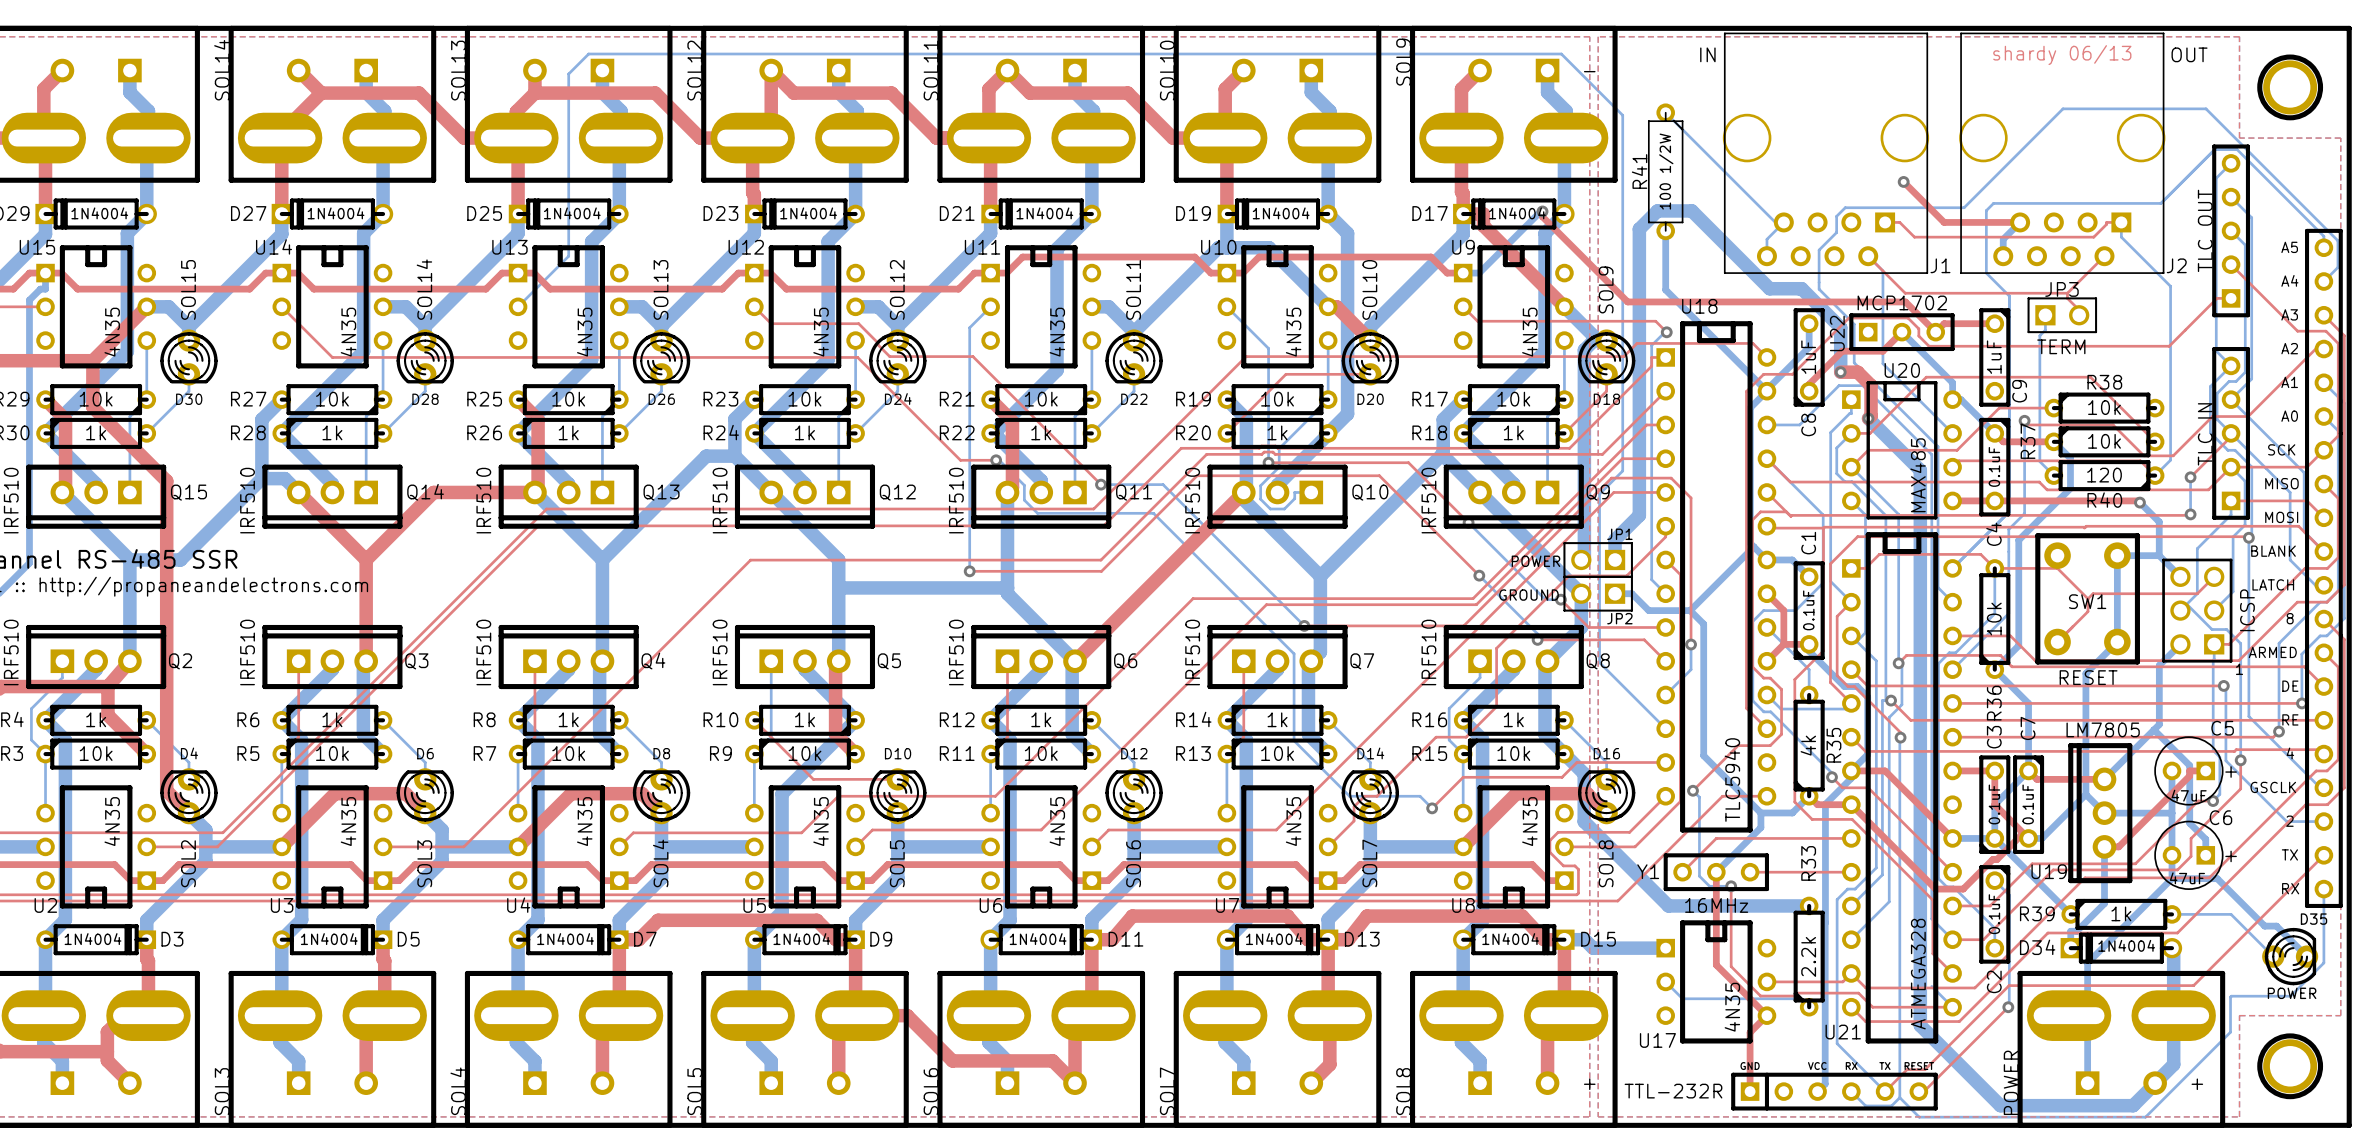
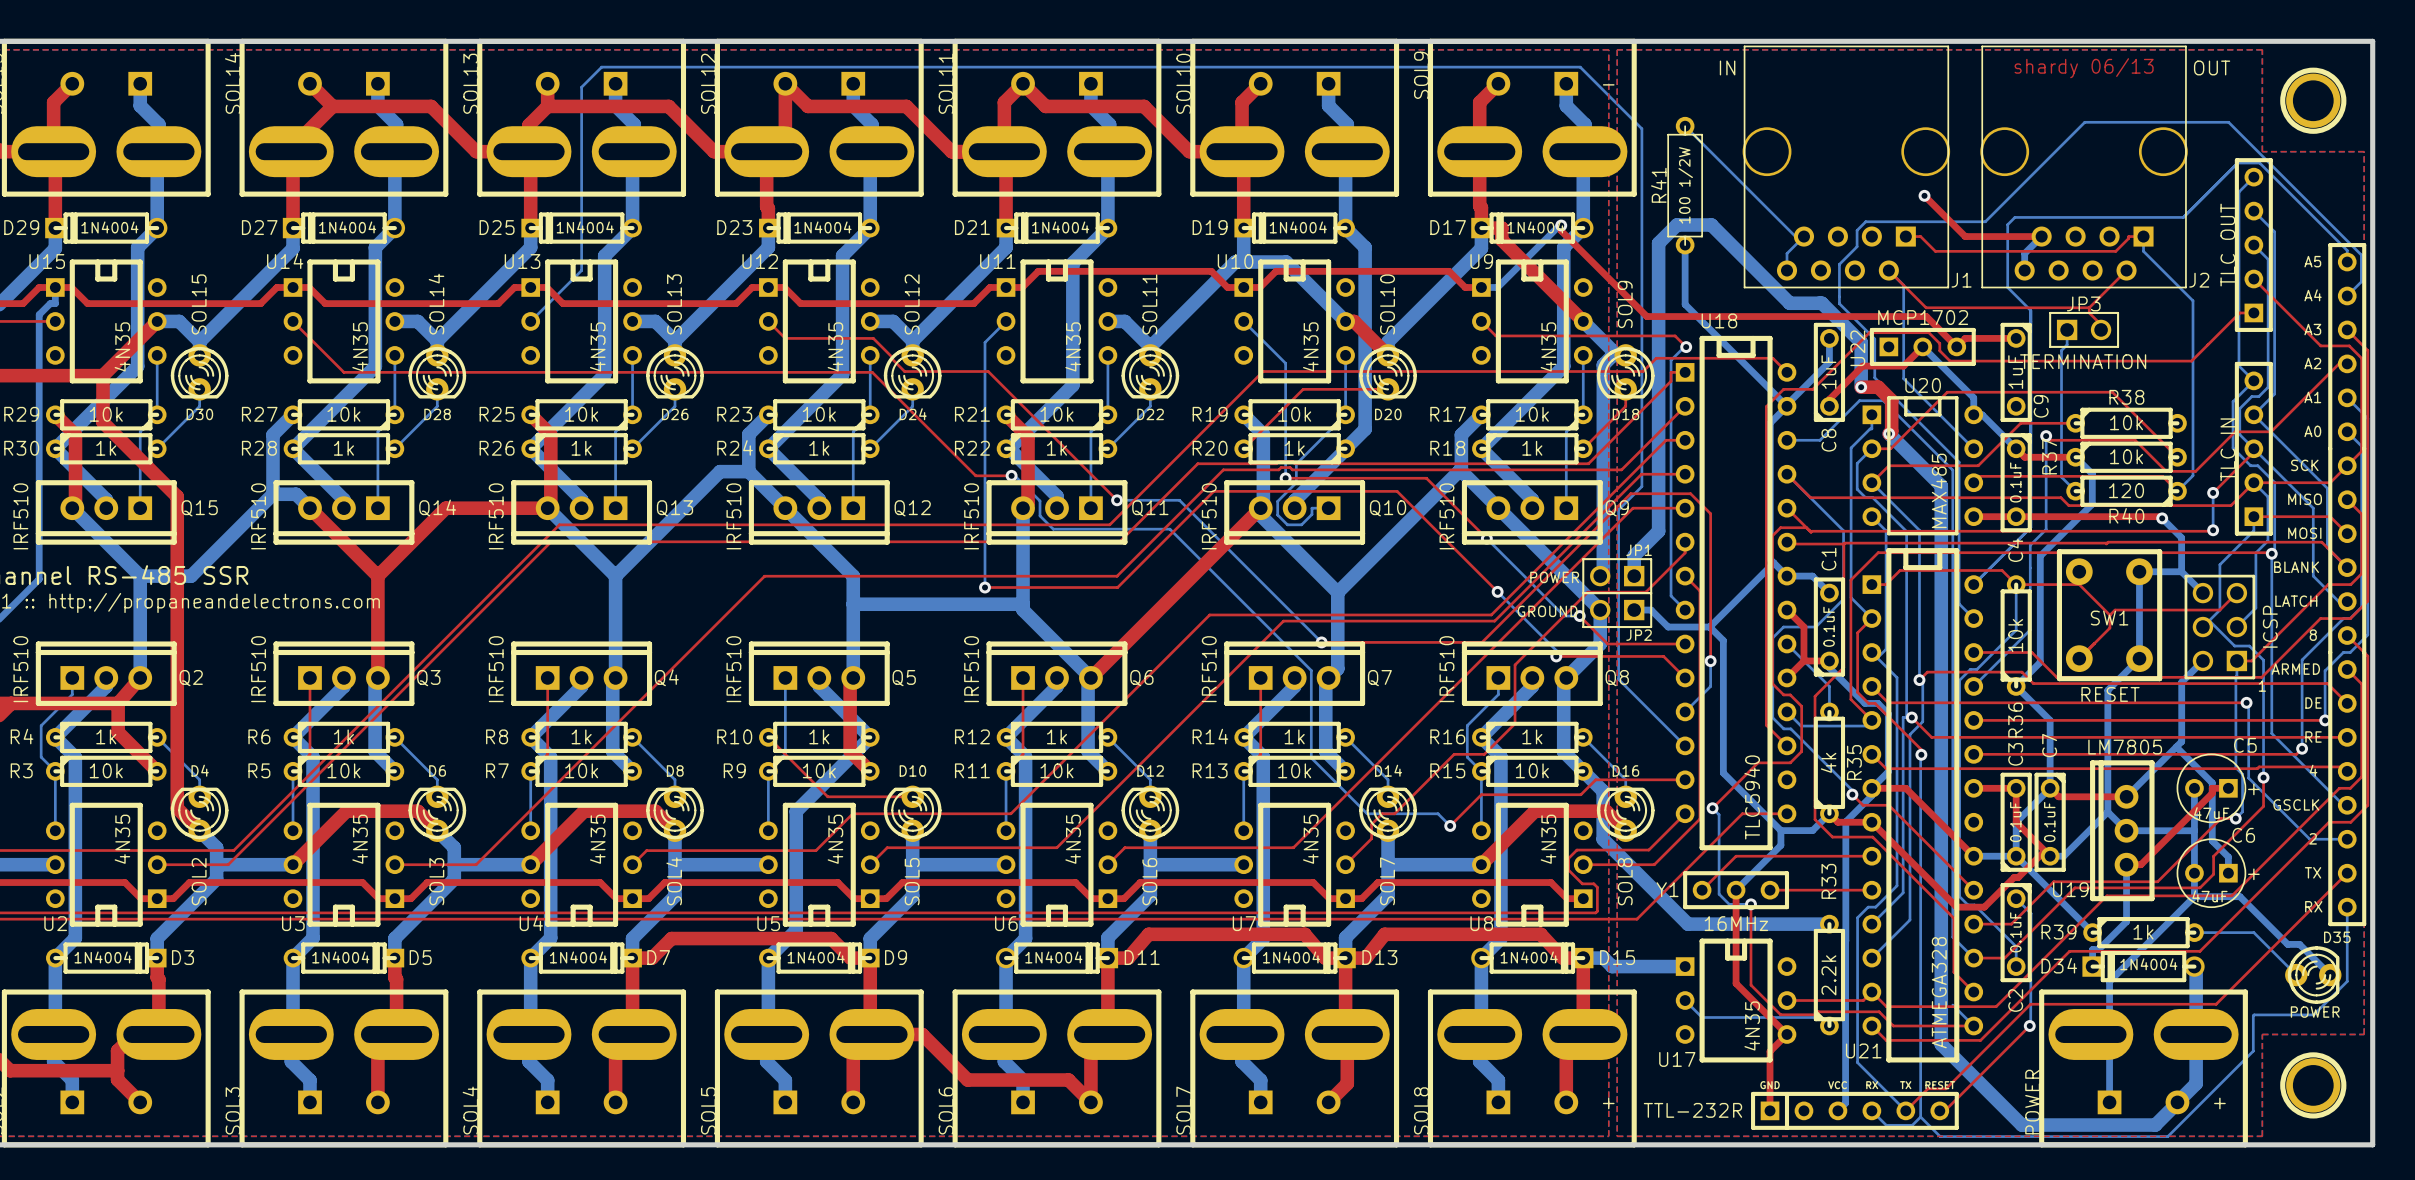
JP3 value: TERM (2061, 346) -> TERMINATION (2083, 361)

